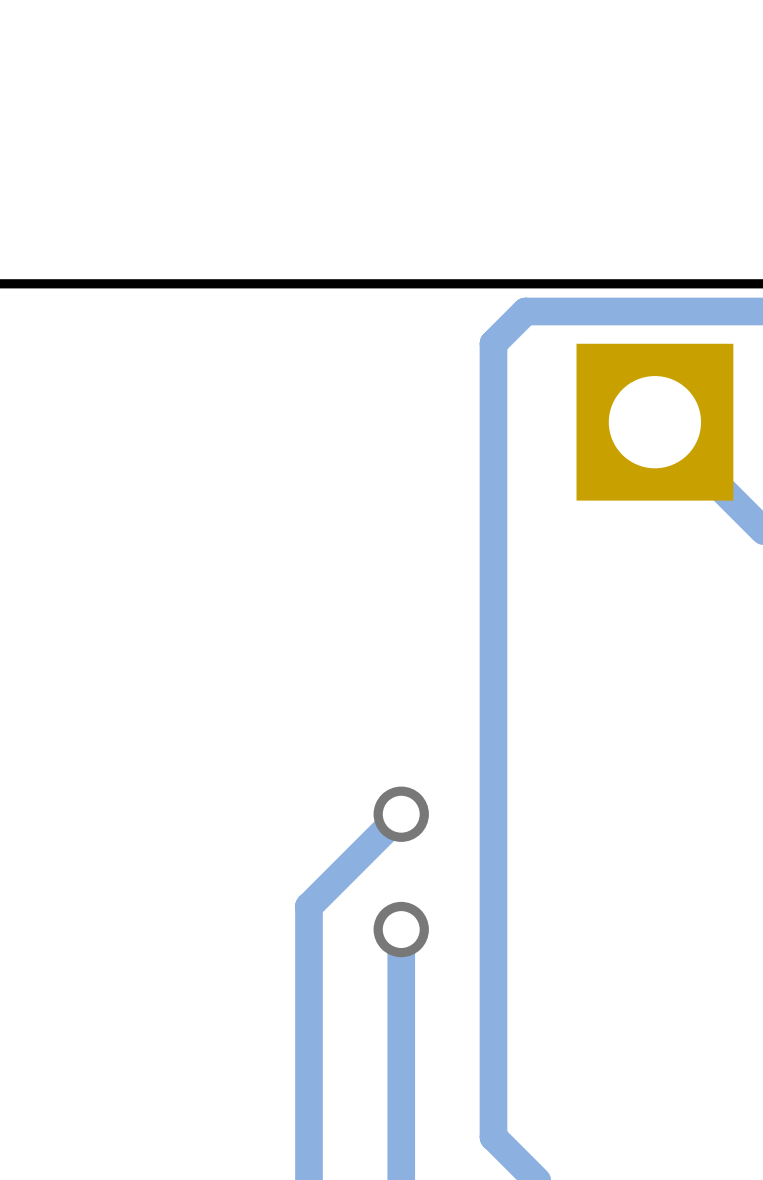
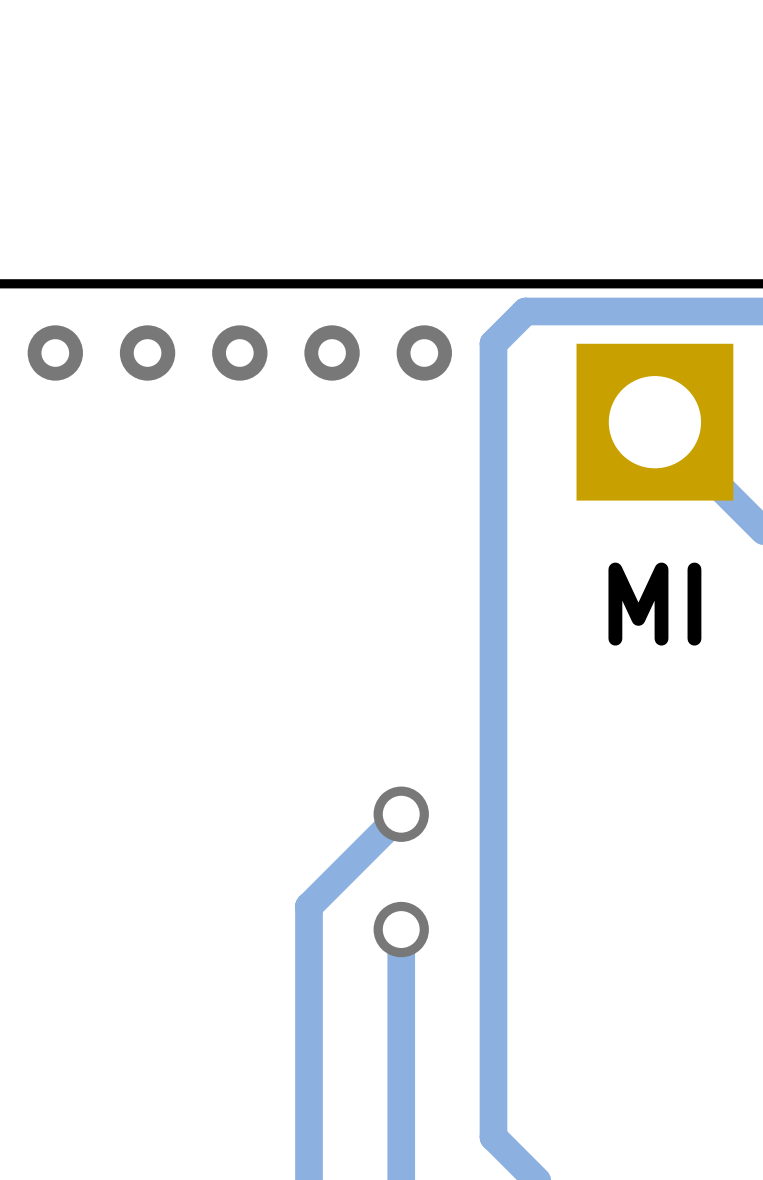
via: none -> (55, 352)
via: none -> (147, 352)
via: none -> (239, 352)
via: none -> (332, 352)
via: none -> (424, 352)
text: none -> MI (654, 604)

